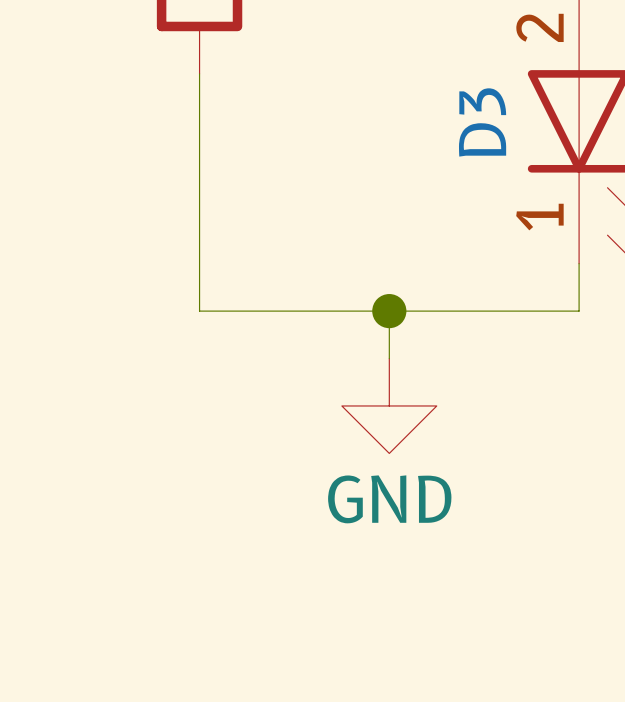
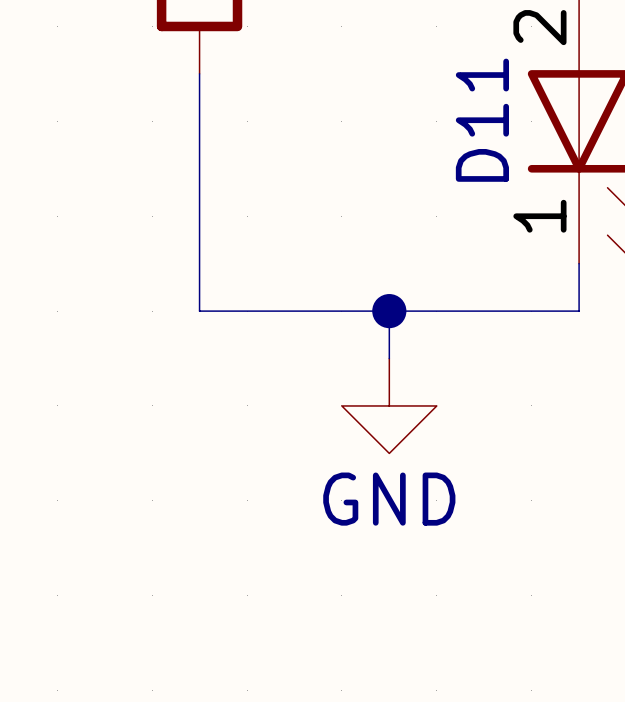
D3 name: D3 (482, 122) -> D11 (482, 120)

